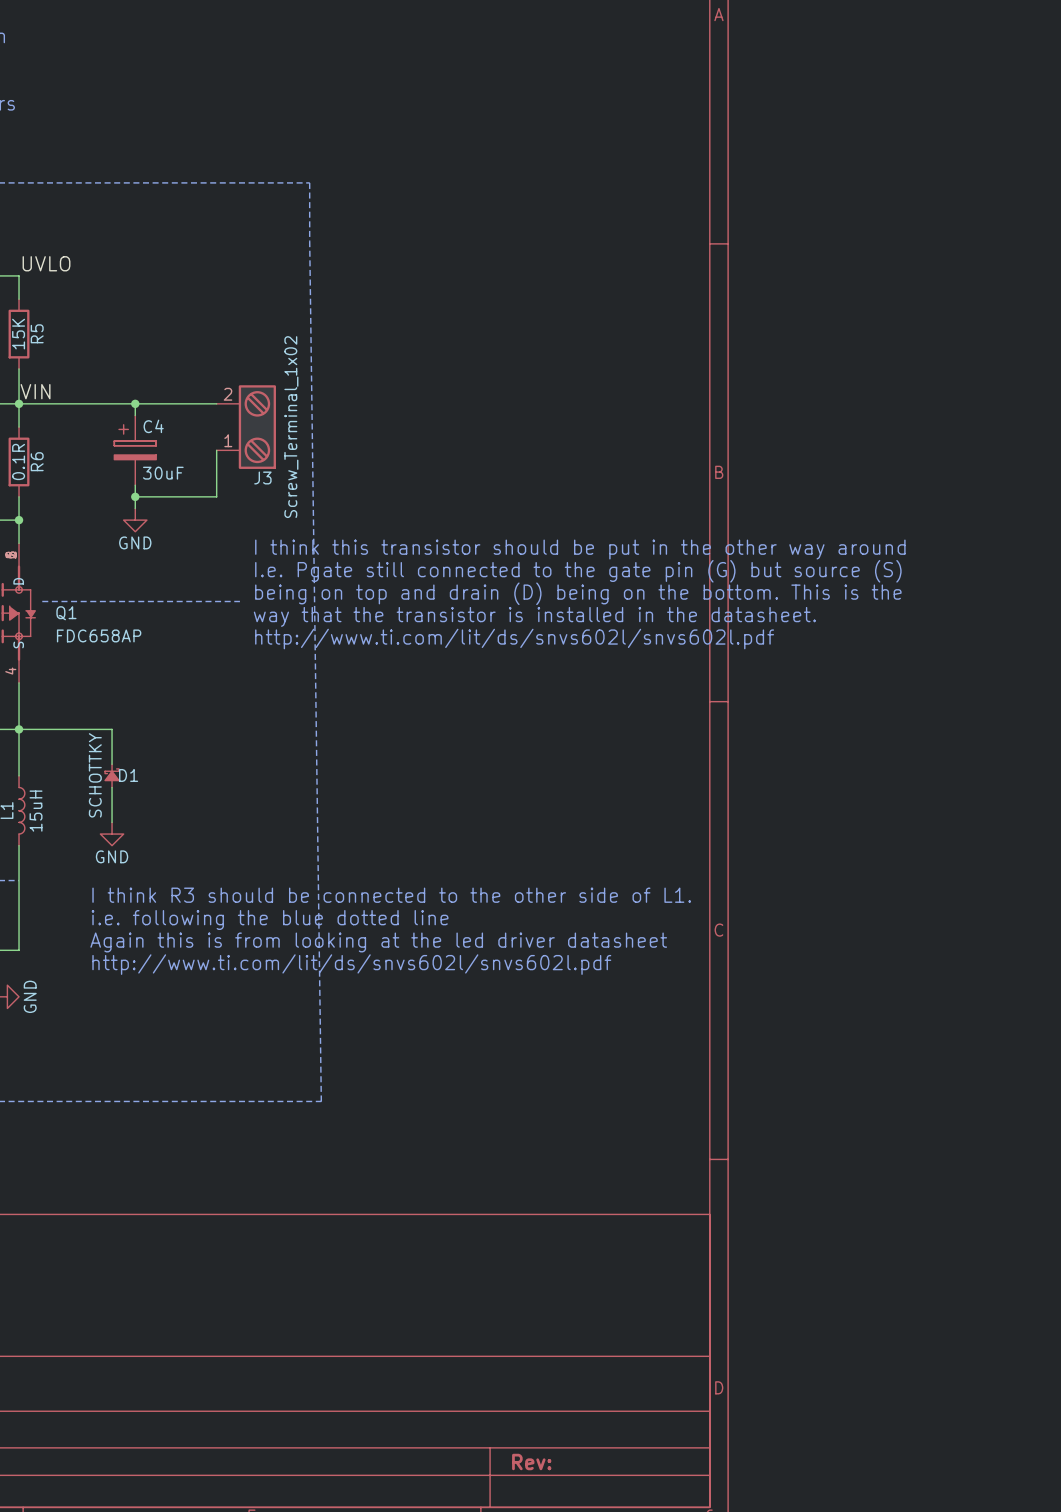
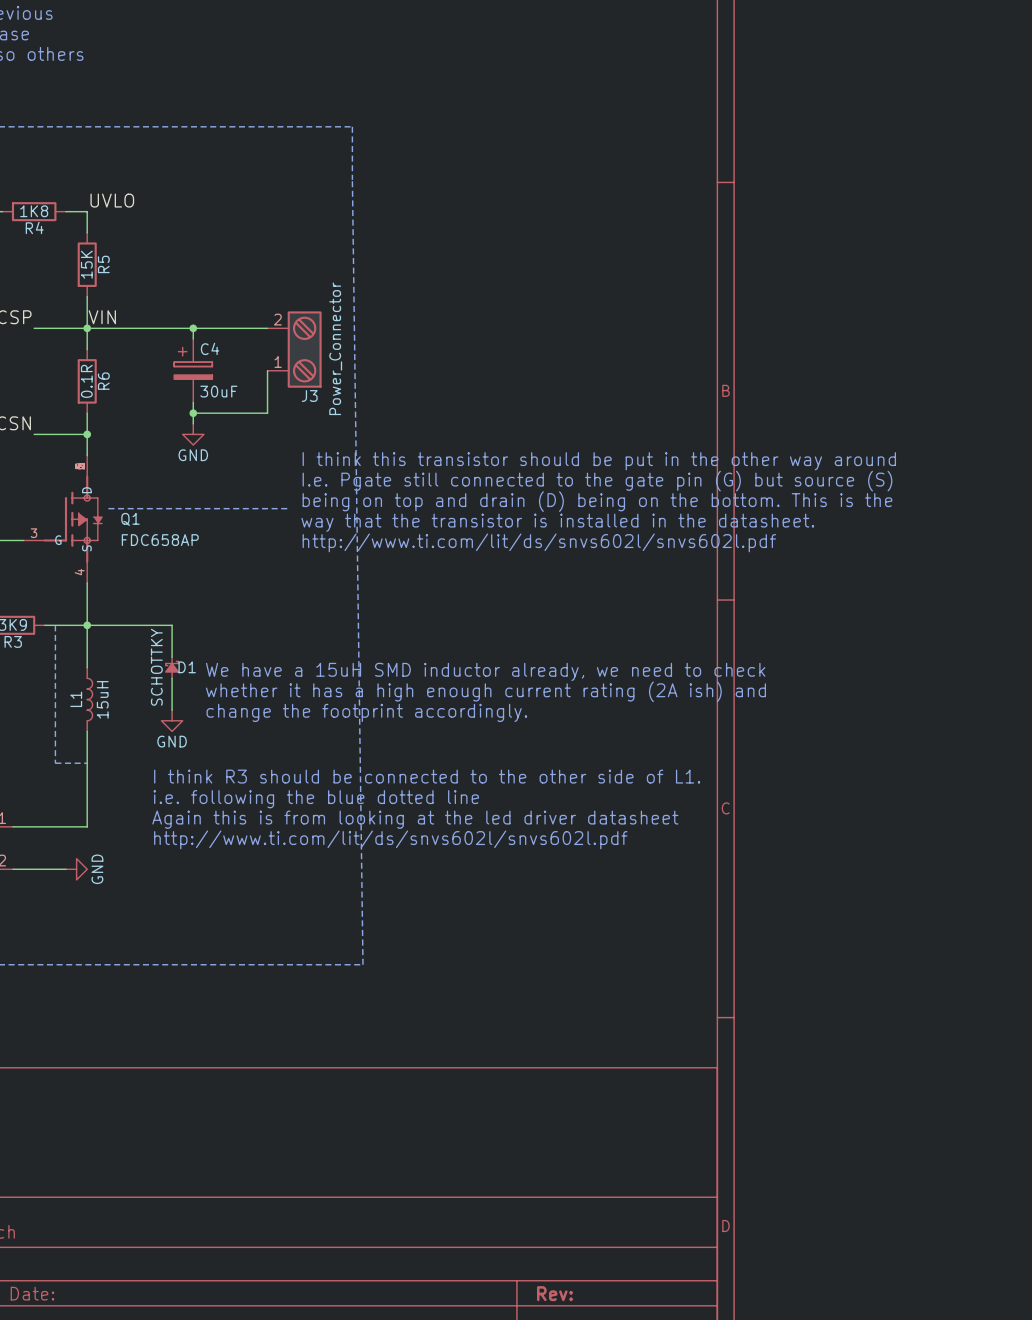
J3 value: Screw_Terminal_1x02 (291, 427) -> Power_Connector (335, 348)
text: none -> We have a 15uH SMD inductor already, we need to check (485, 671)
text: none -> whether it has a high enough current rating (2A ish) and (485, 691)
text: none -> change the footprint accordingly. (366, 712)

